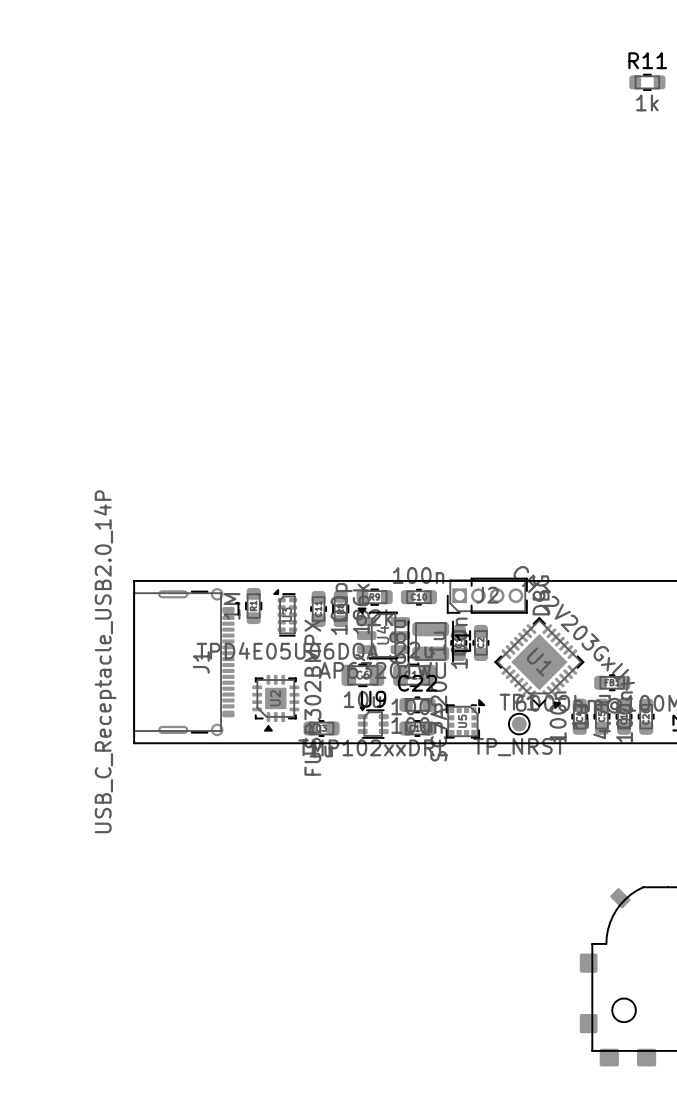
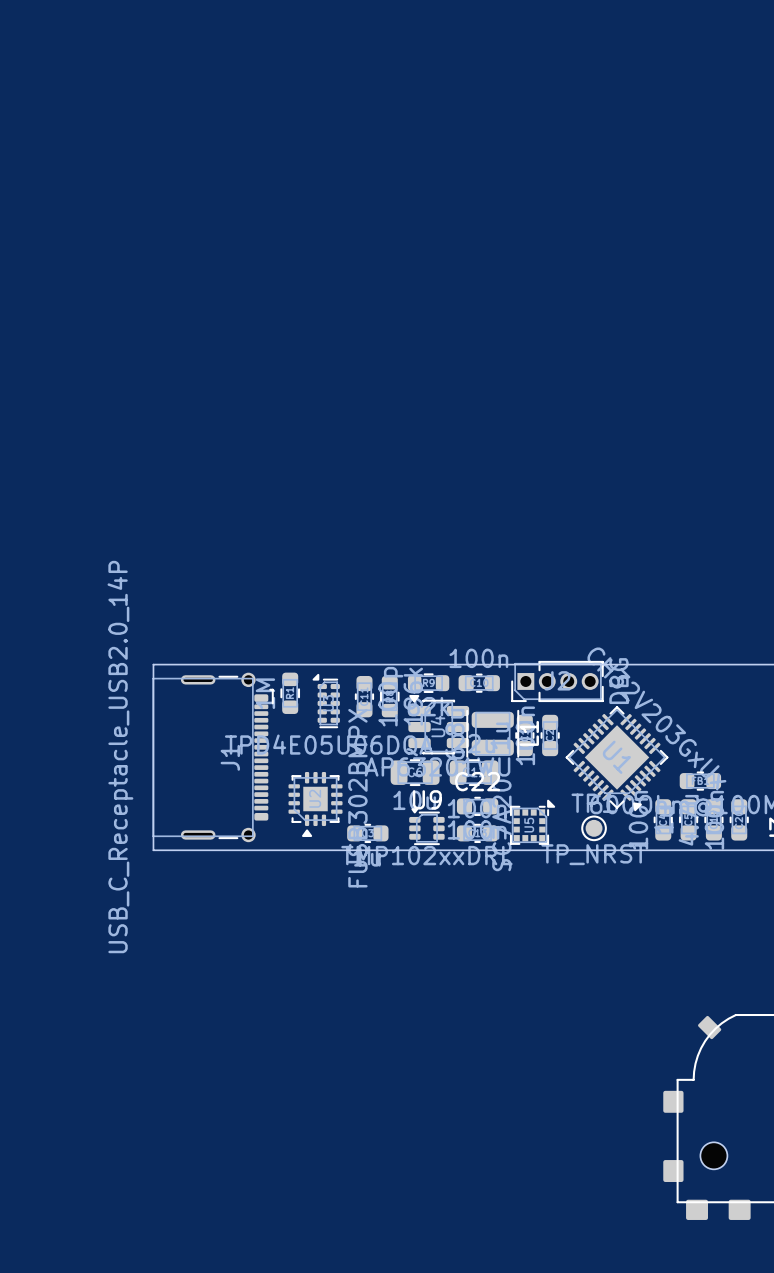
R11: 1k (647, 82) -> none

